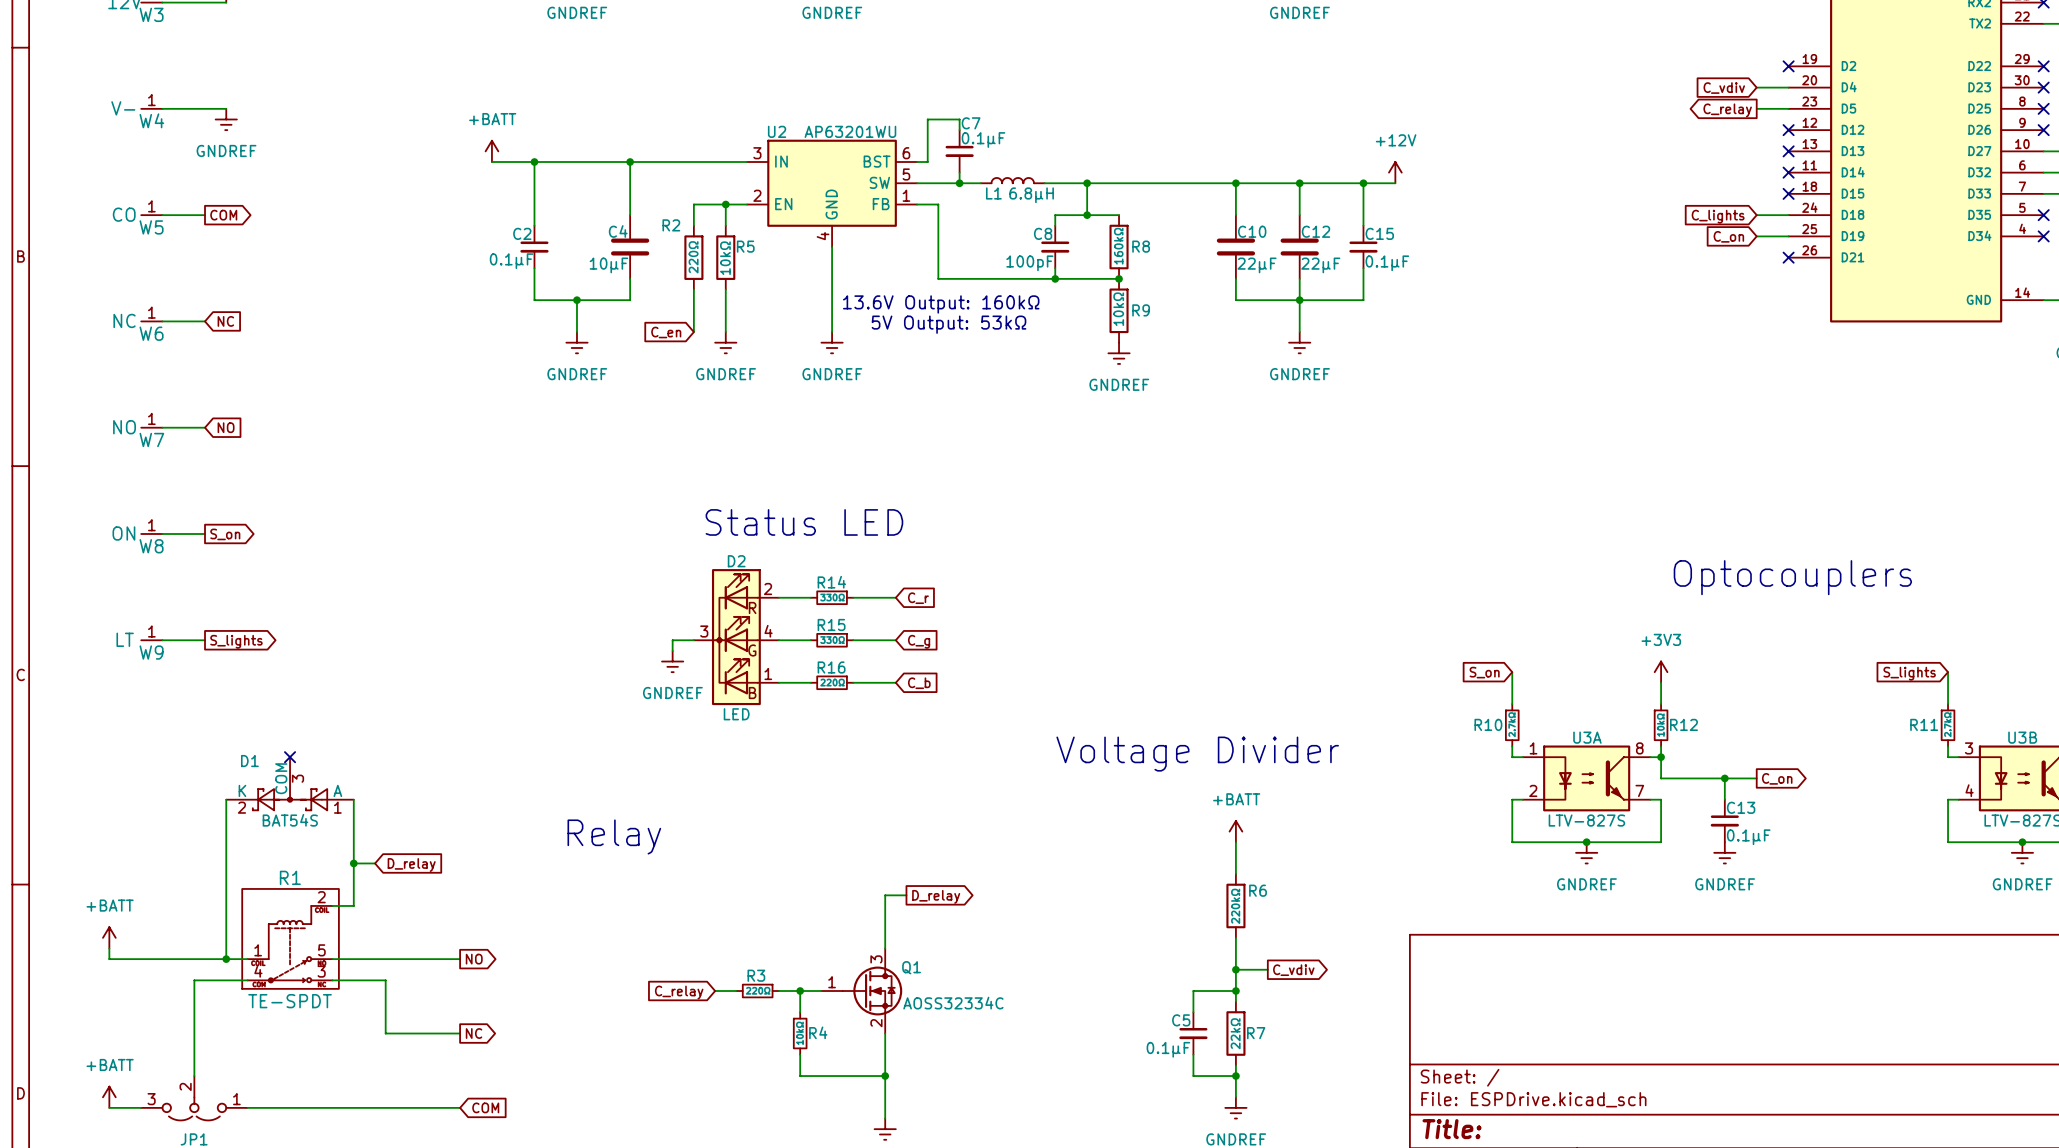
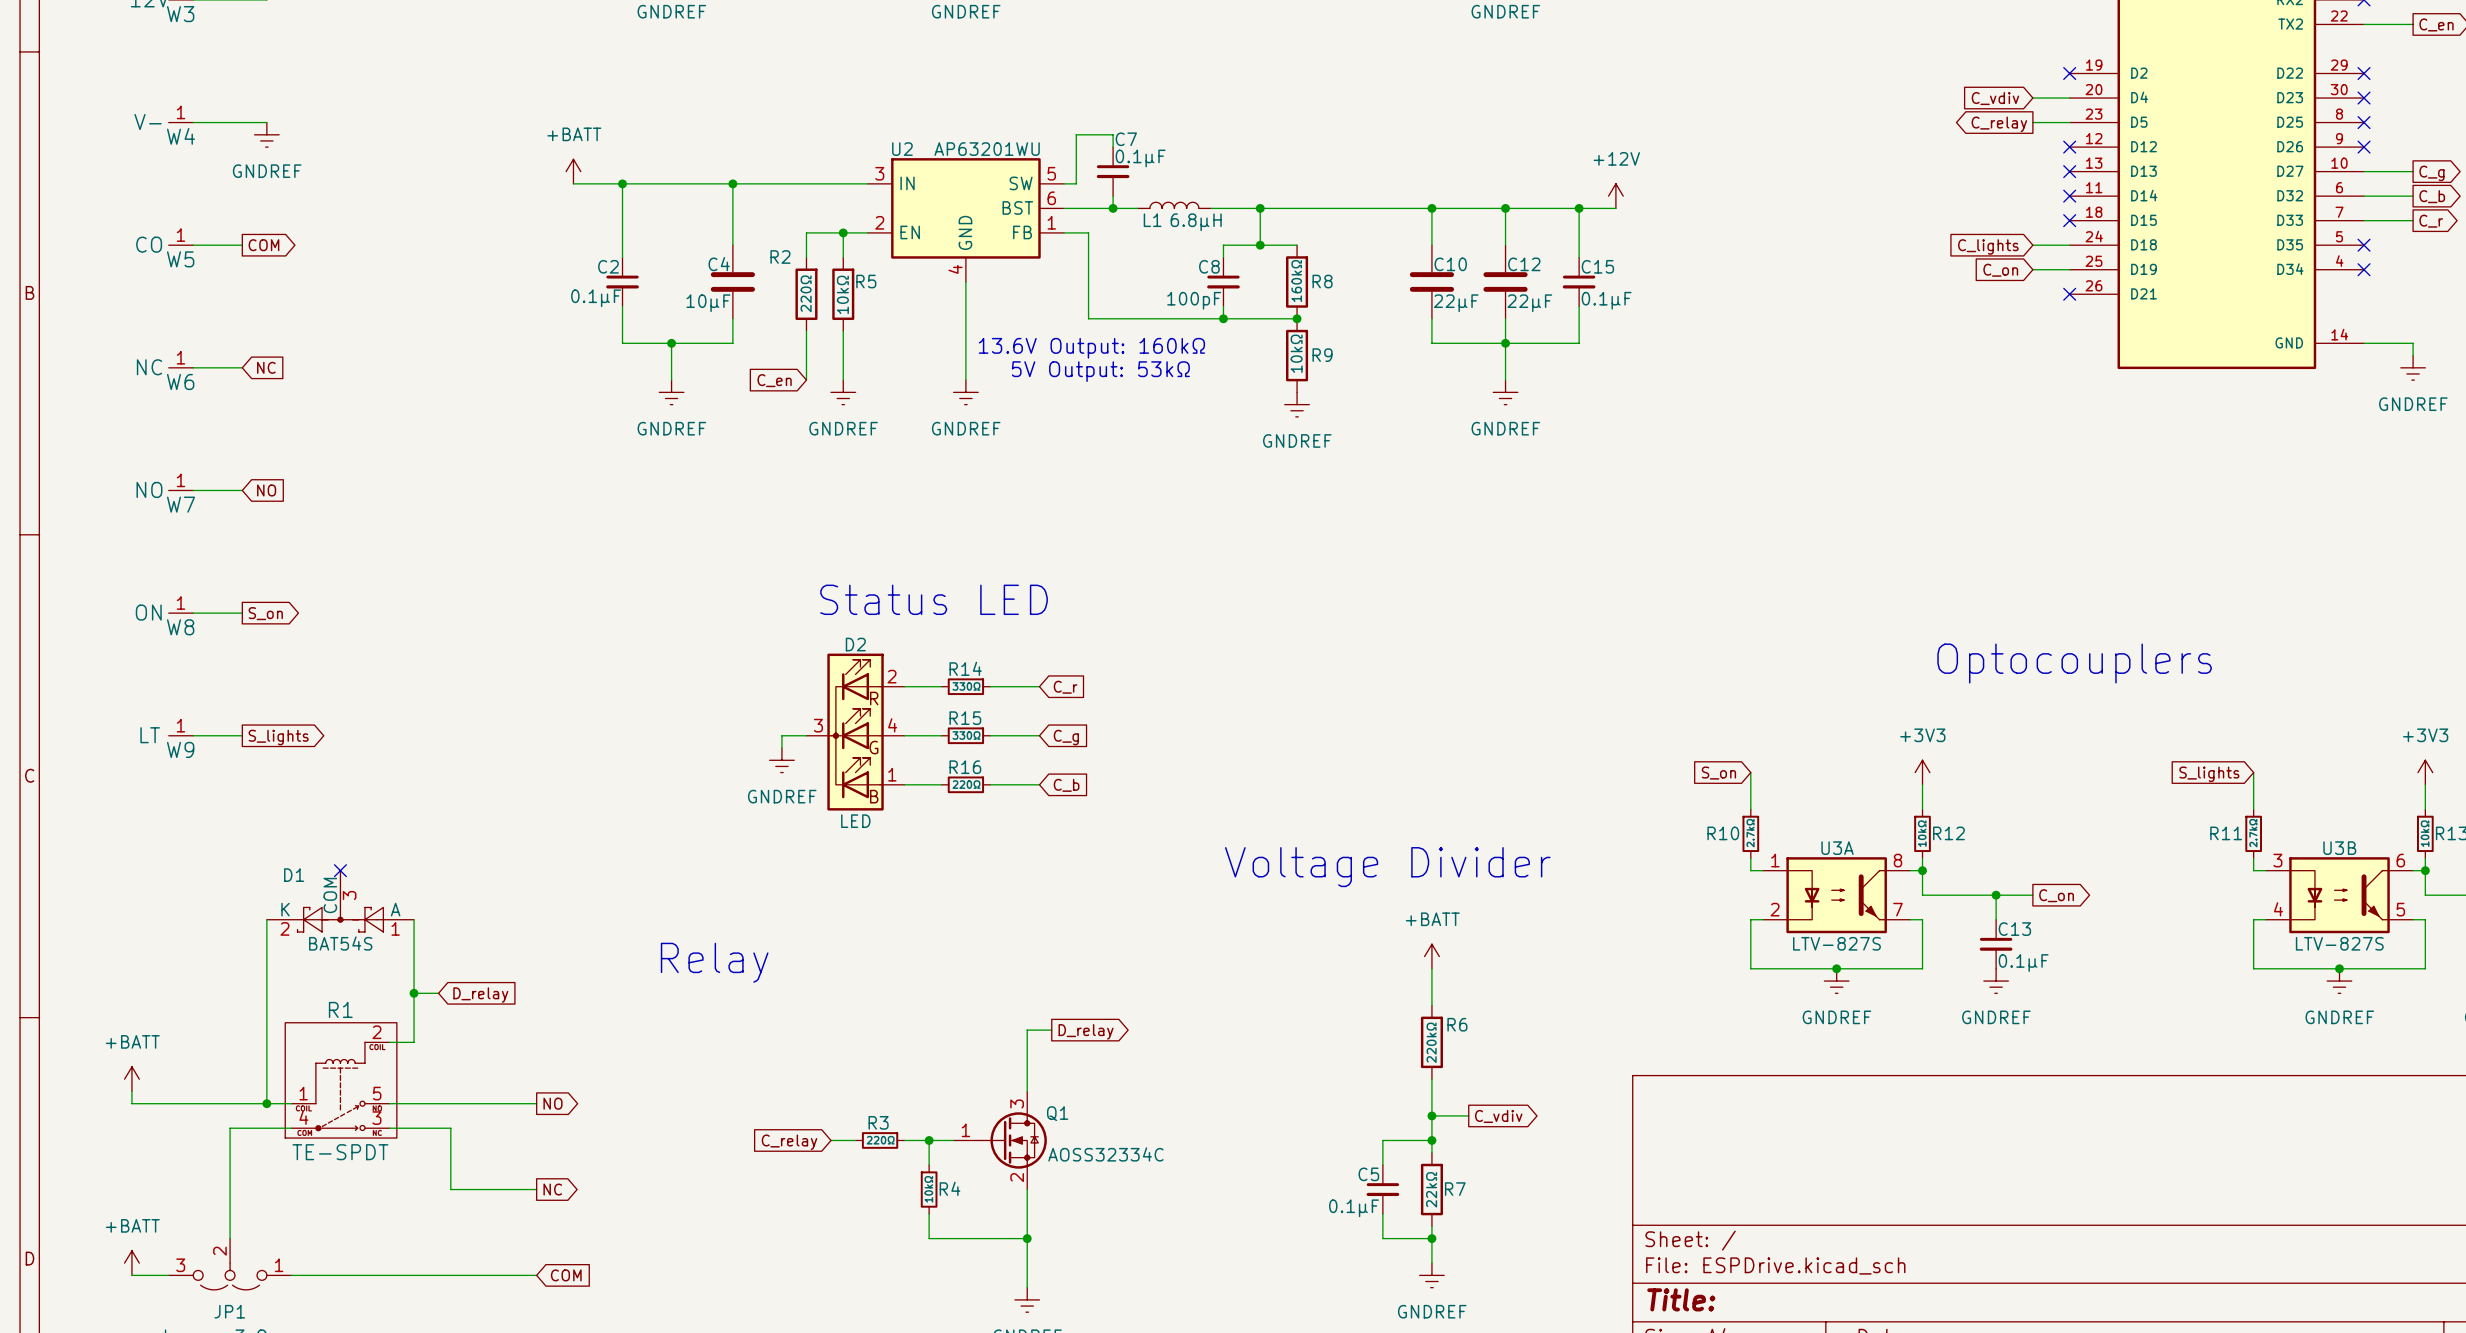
U2 pin number: 6 (906, 153) -> 5 (1051, 173)
U2 pin name: BST (877, 161) -> SW (1021, 183)
U2 pin number: 5 (906, 174) -> 6 (1051, 198)
U2 pin name: SW (879, 182) -> BST (1017, 207)

